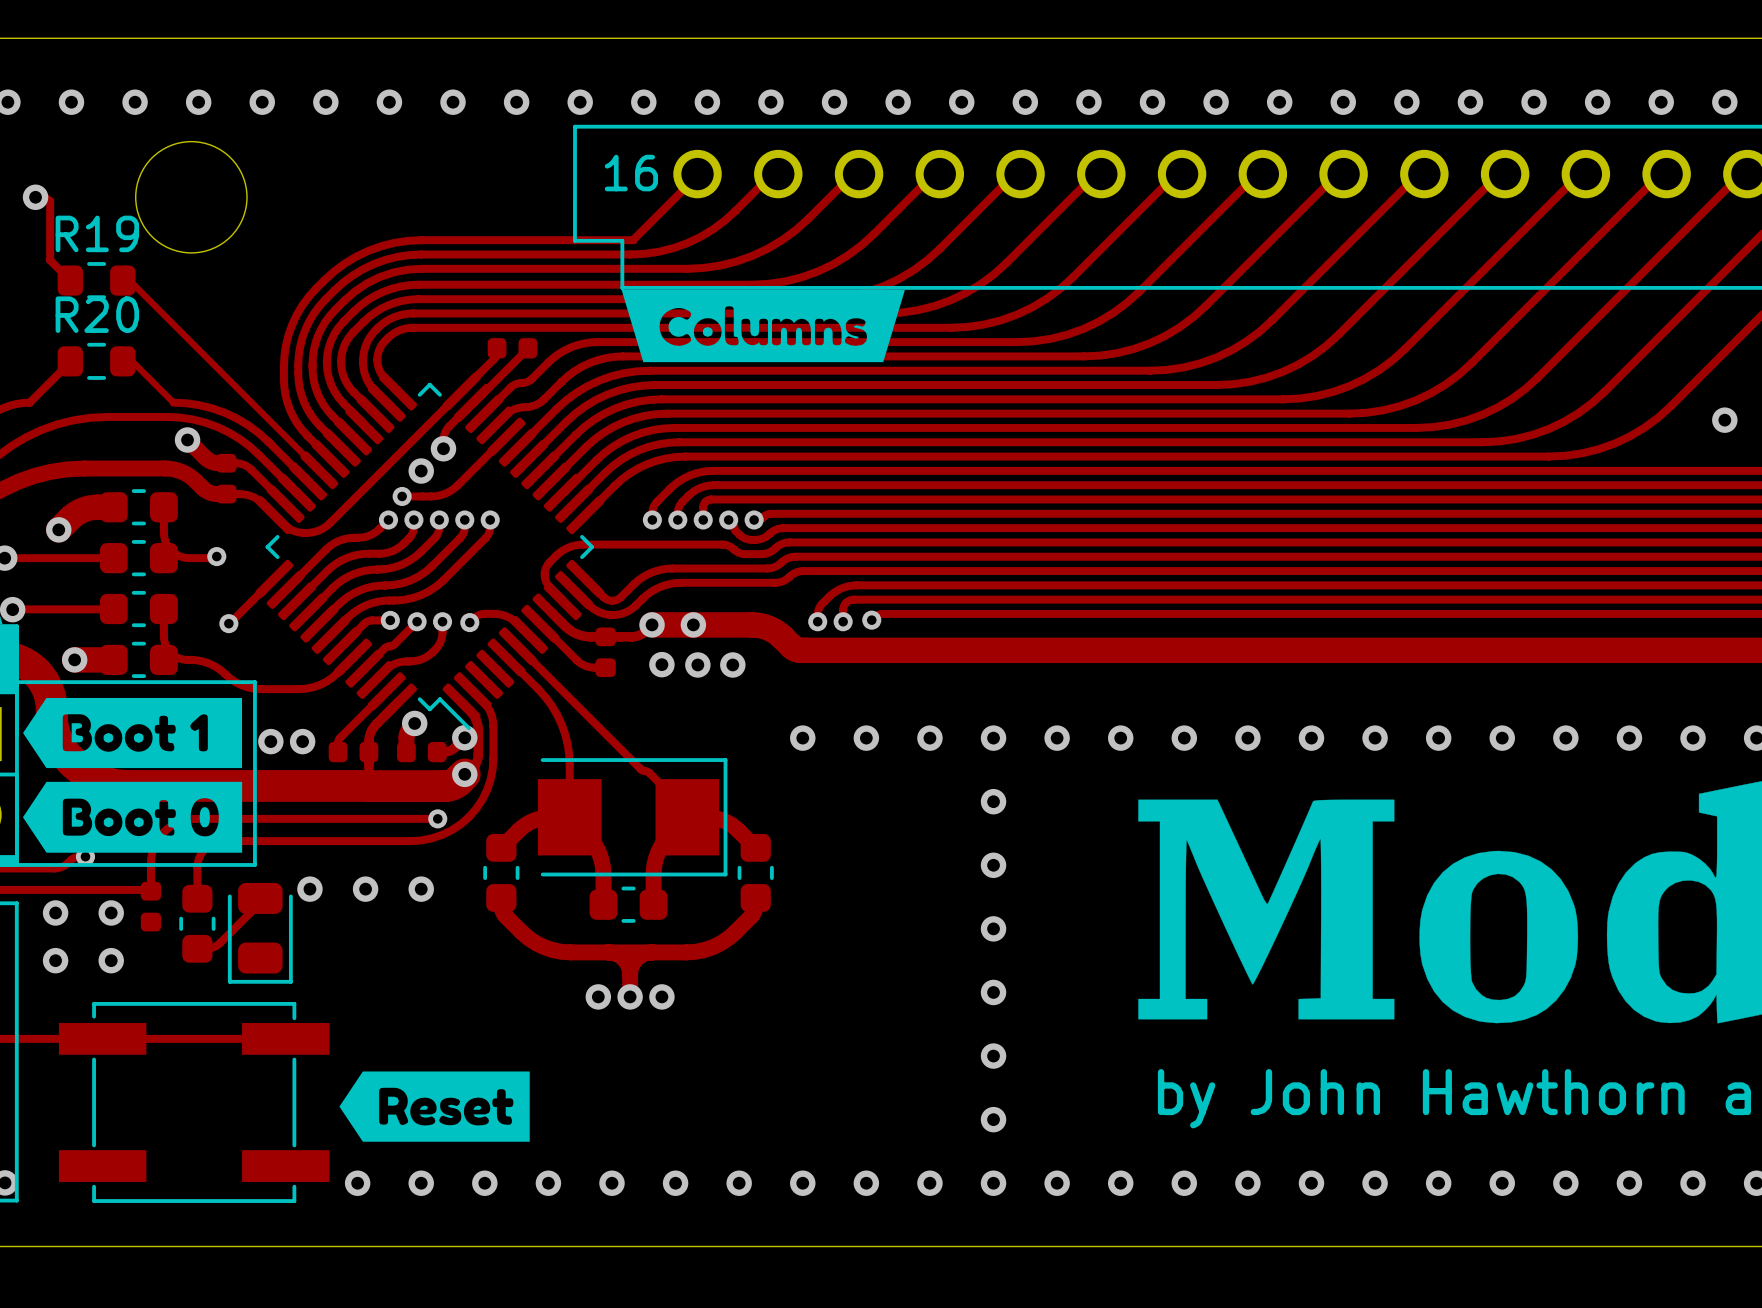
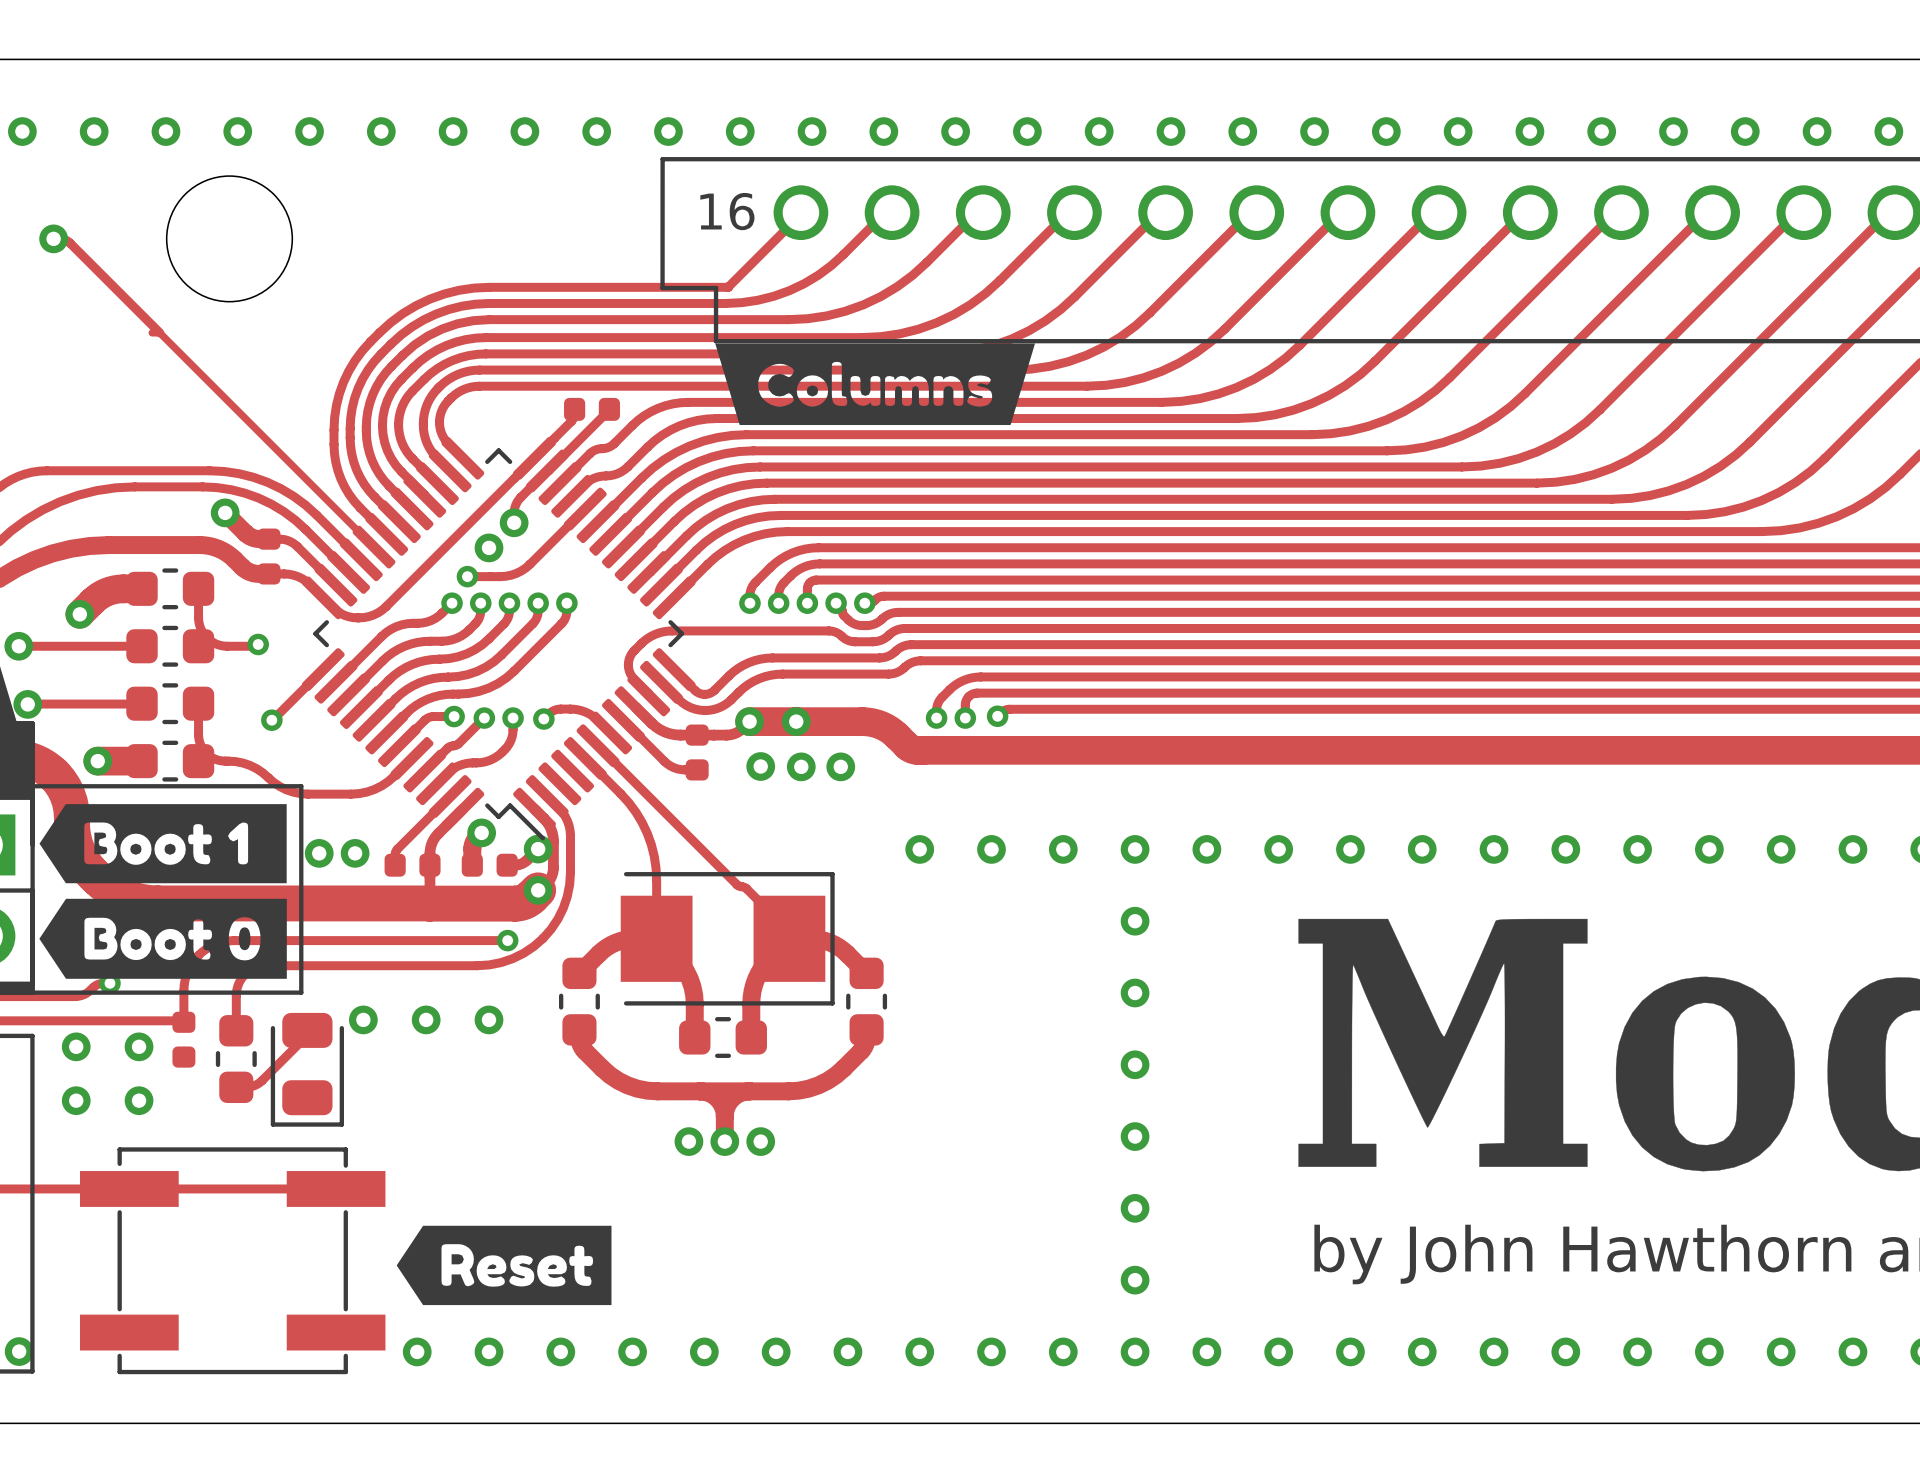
track: (50, 201) (50, 260) (70, 280) -> (70, 243) (159, 332)
R19: (96, 280) -> none
track: (70, 361) (29, 402) -> none
R20: (96, 361) -> none
track: (122, 361) (132, 361) (173, 402) -> (47, 470) (209, 470)

